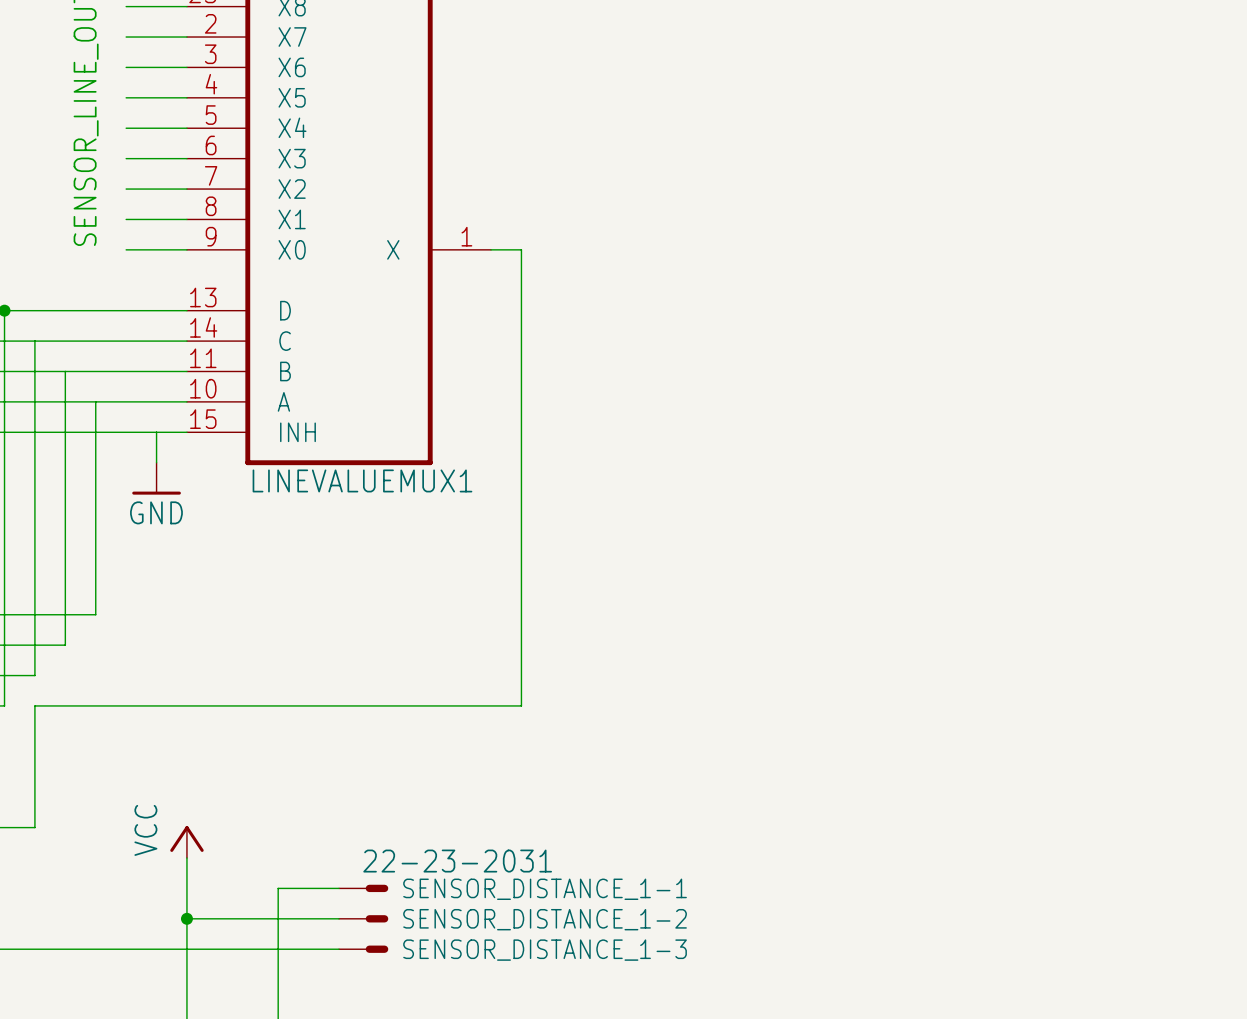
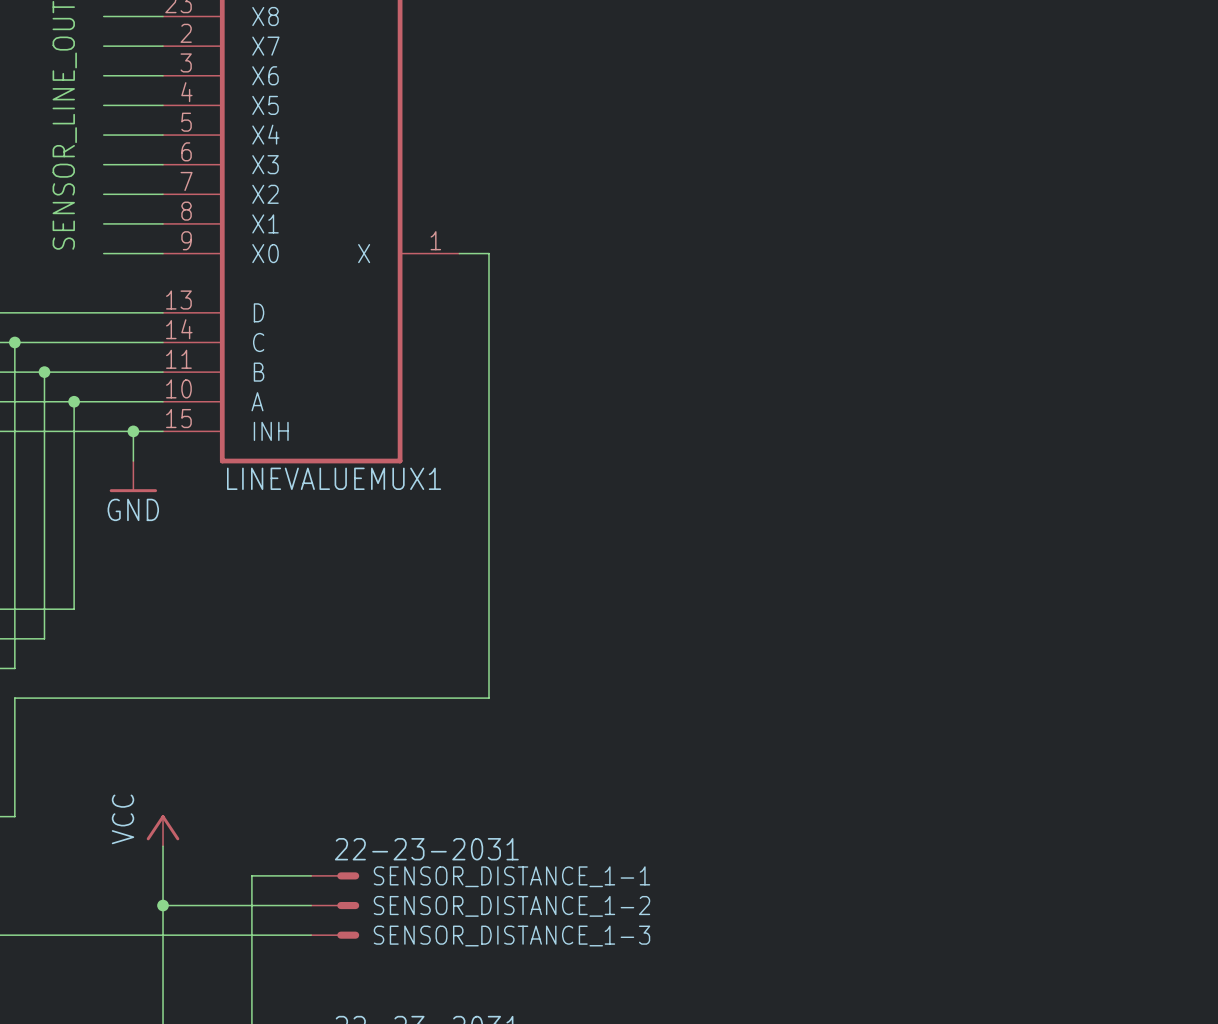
junction: none -> (14, 342)
junction: none -> (44, 372)
junction: none -> (74, 401)
junction: none -> (133, 431)

